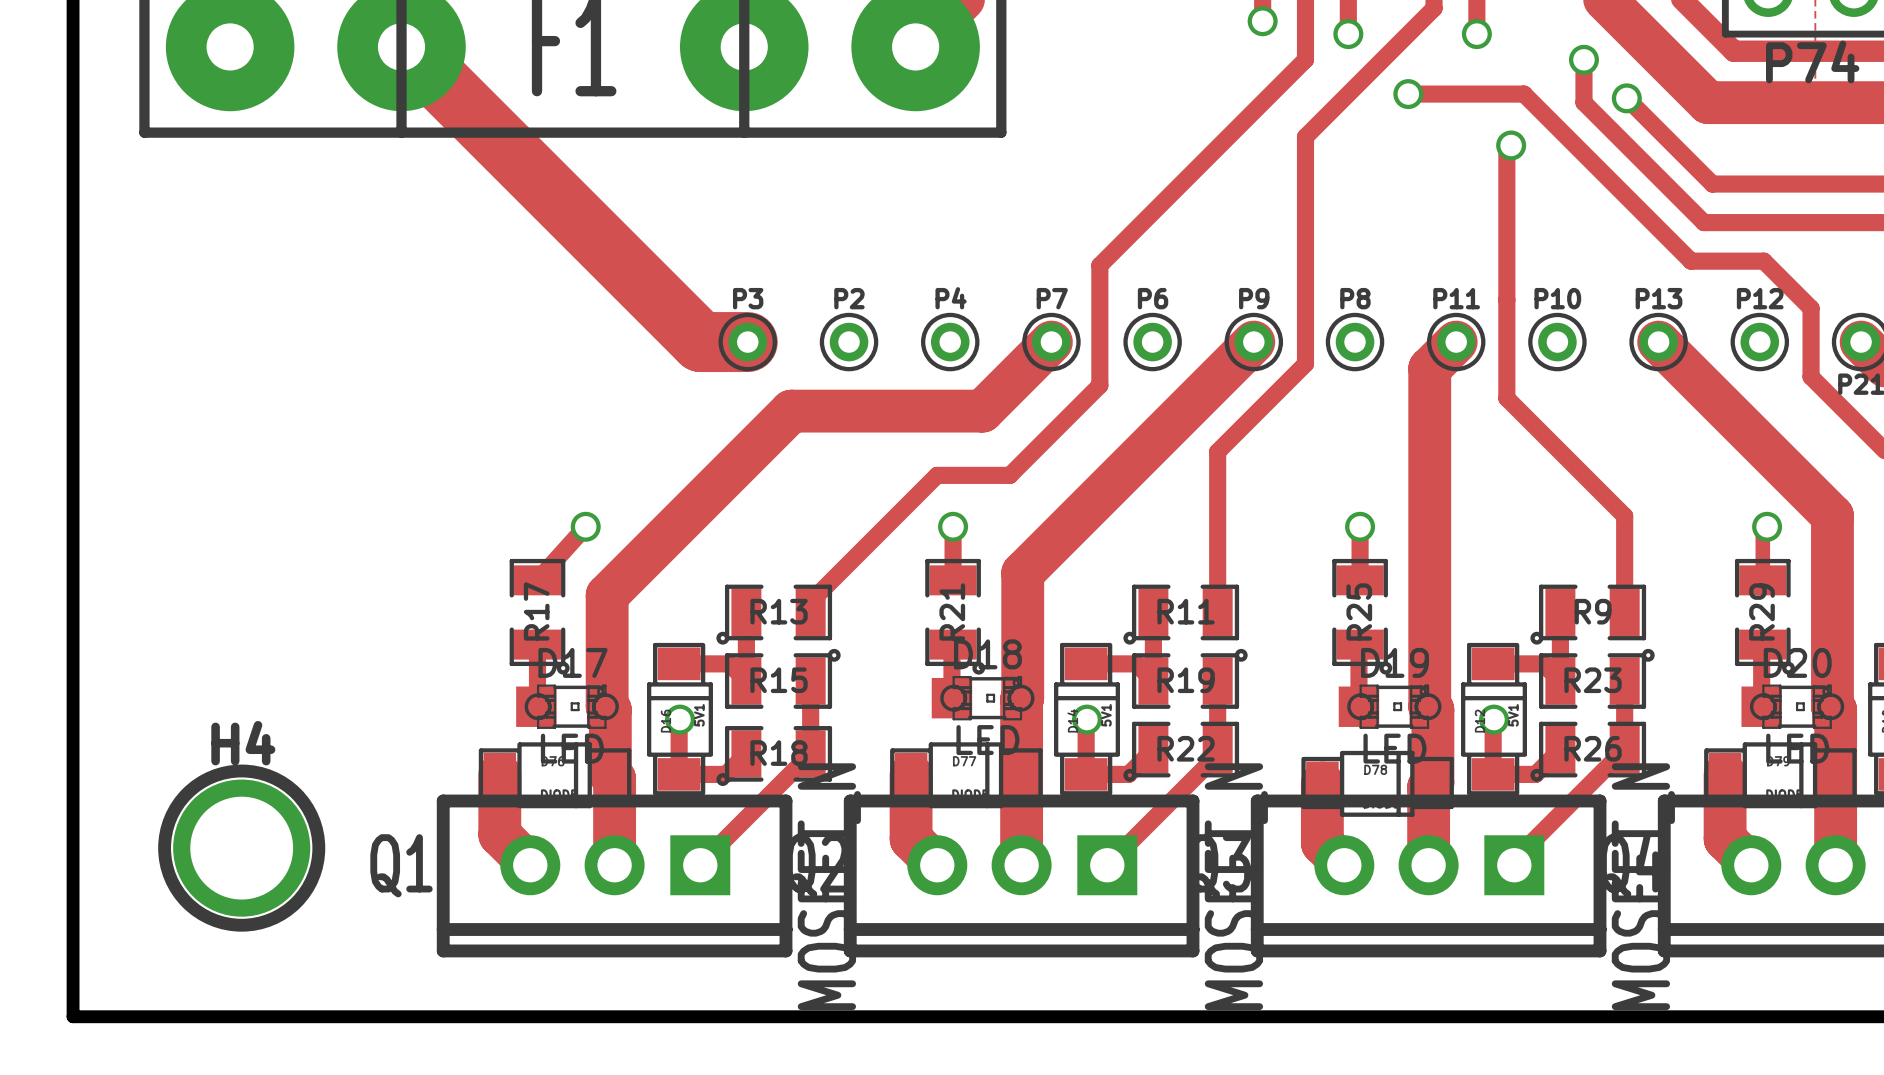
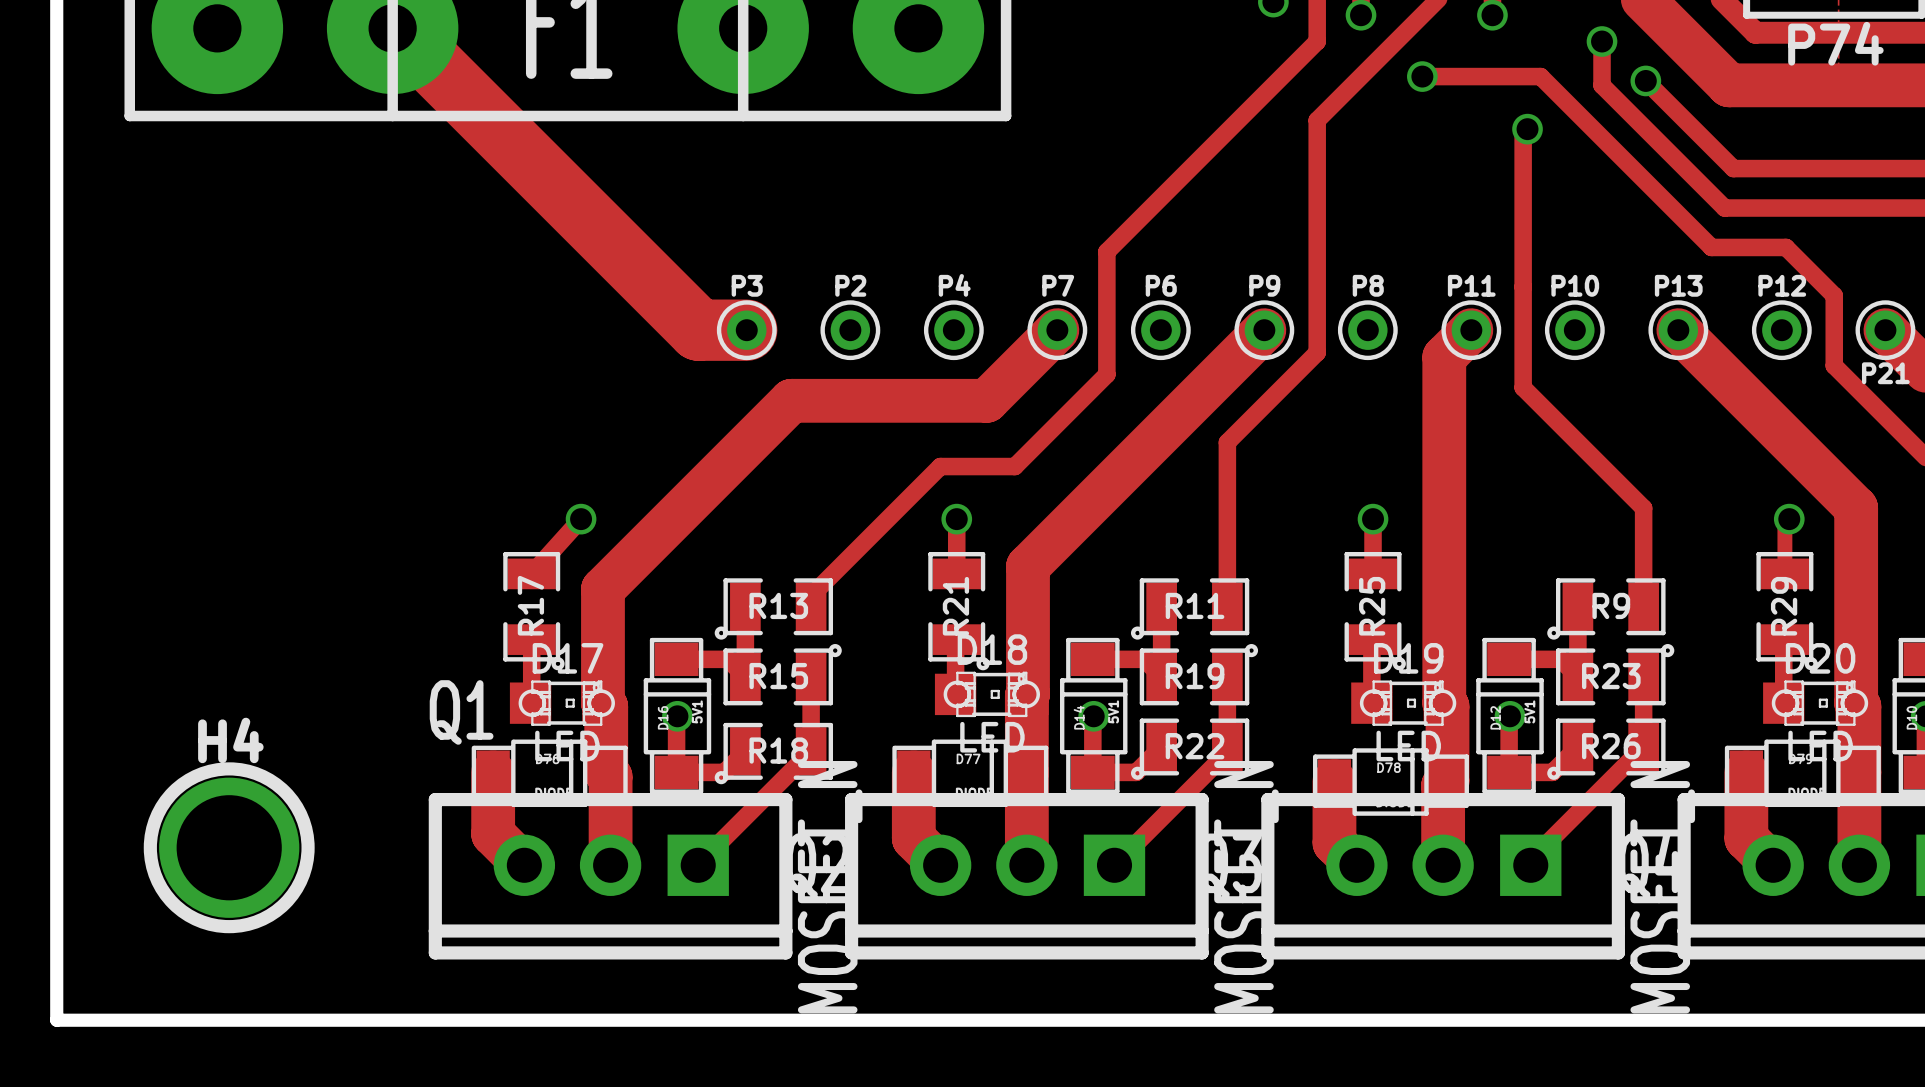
Q1 name position: Q1 (401, 865) -> Q1 (461, 712)

